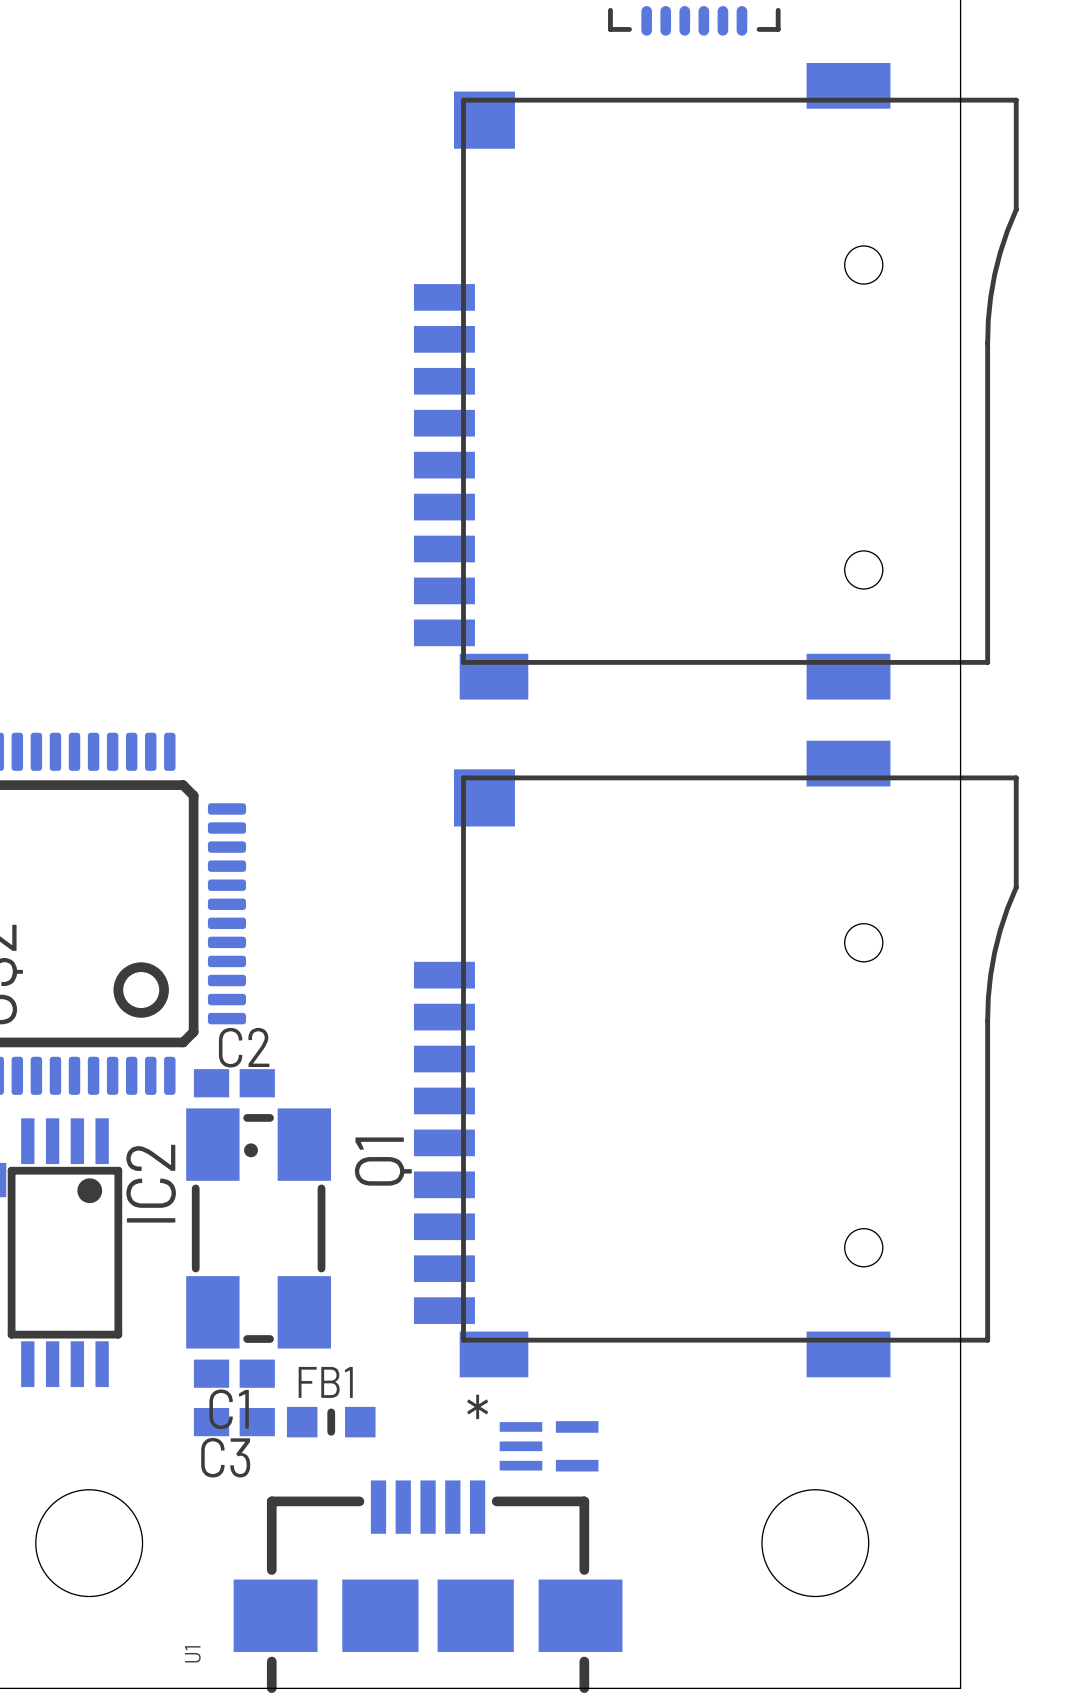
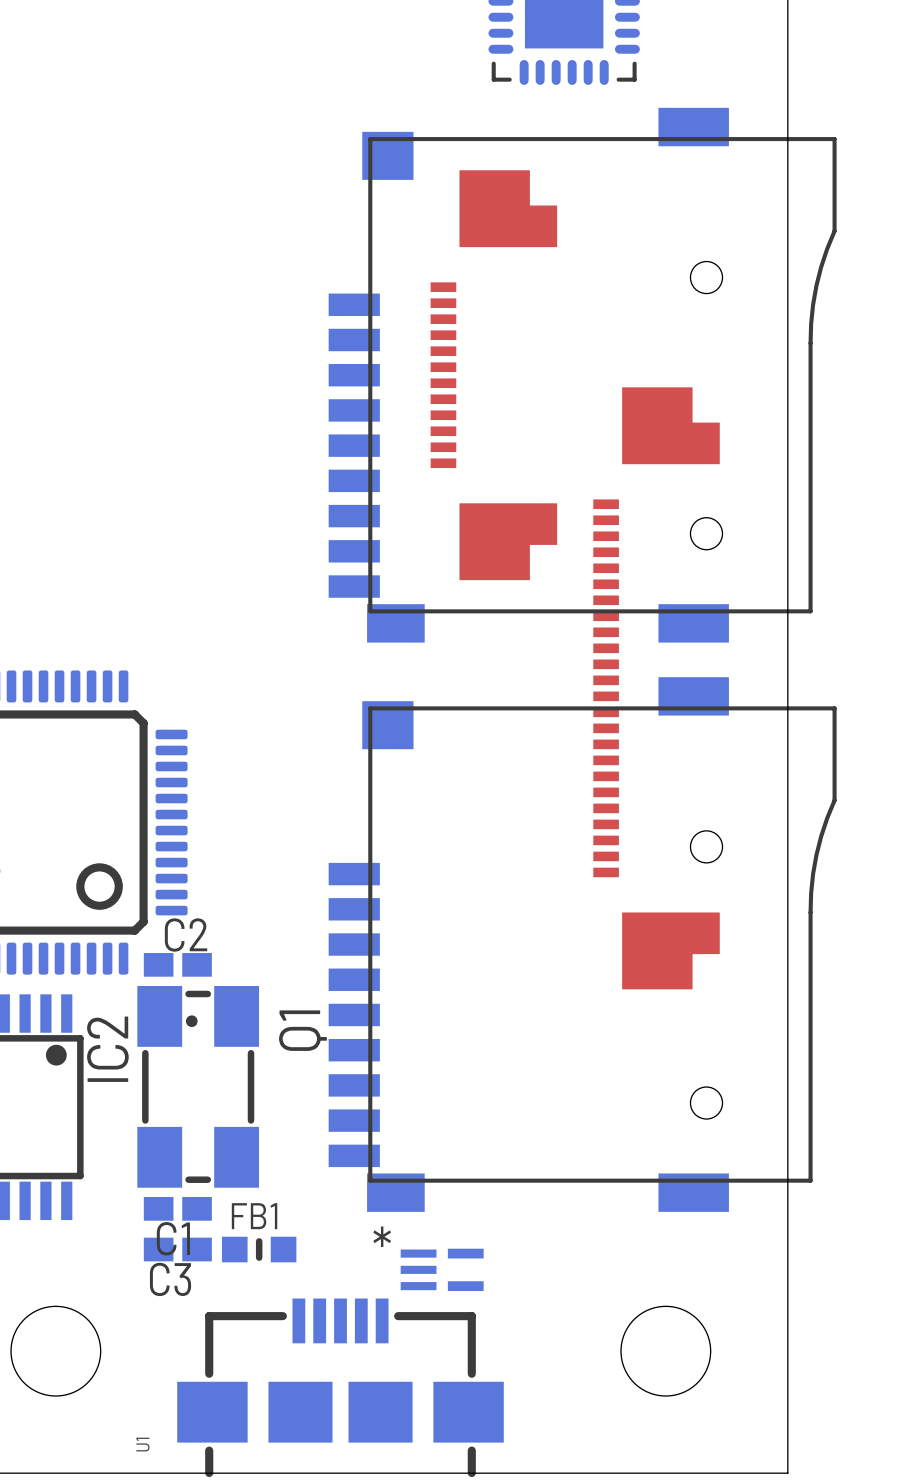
part: none -> (493, 375)
part: none -> (656, 688)

